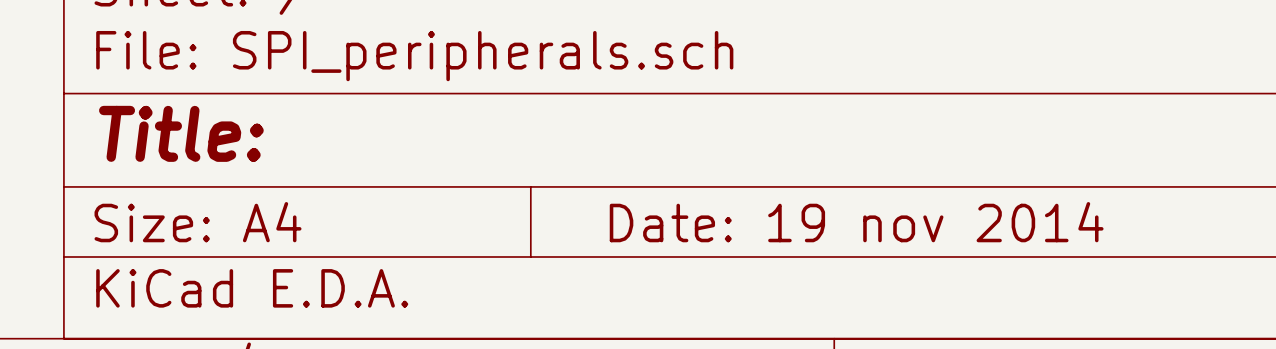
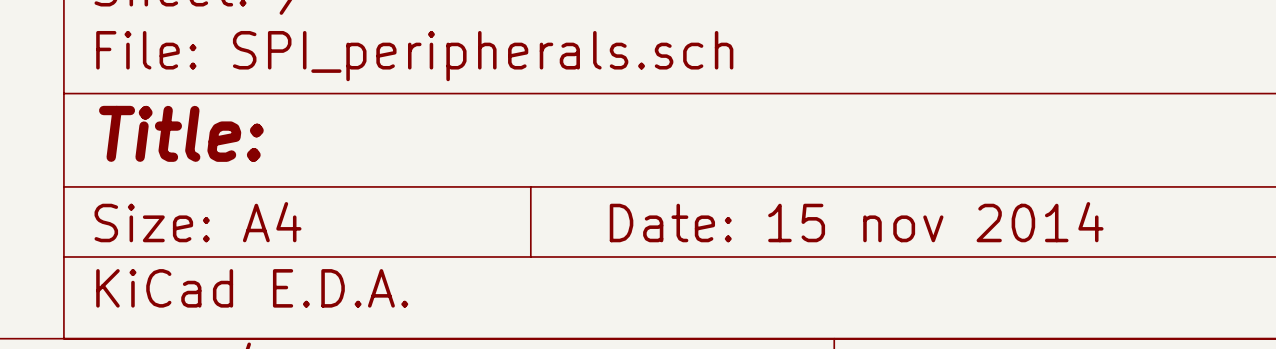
title block: Date: 19 nov 2014 (856, 222) -> Date: 15 nov 2014 (856, 222)

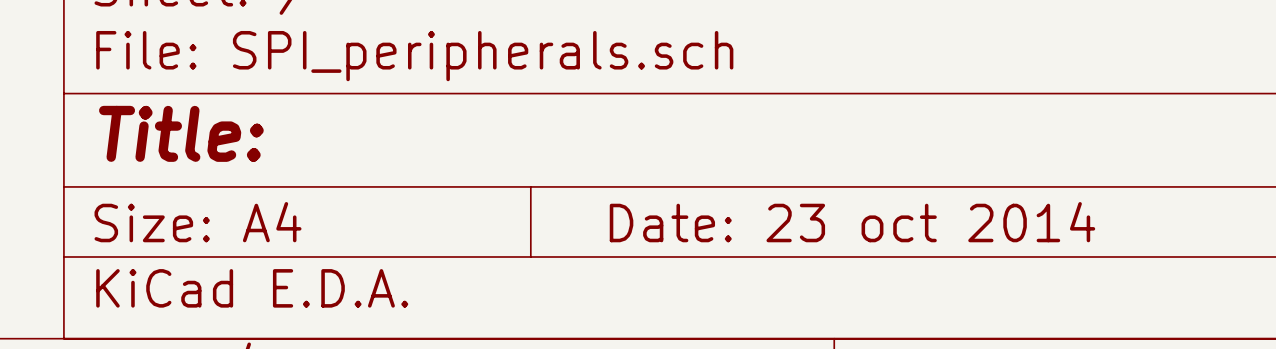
title block: Date: 15 nov 2014 (856, 222) -> Date: 23 oct 2014 (852, 222)

